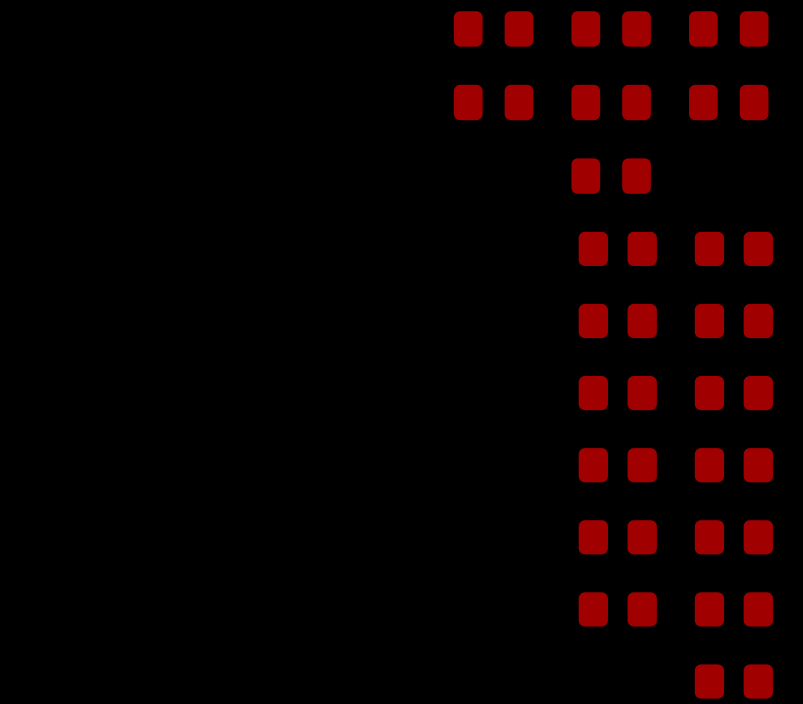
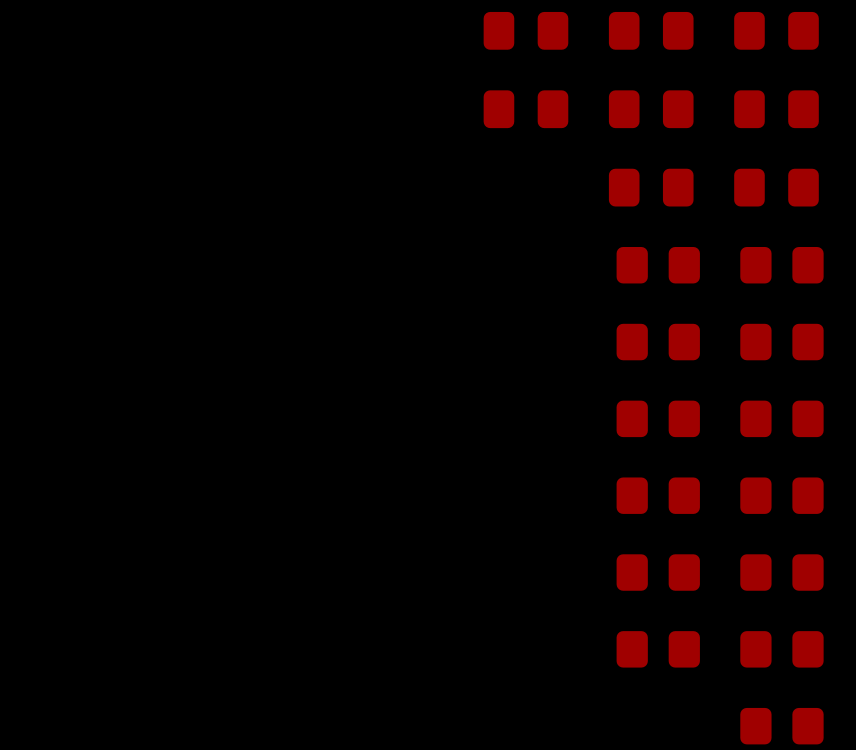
part: none -> (776, 187)

